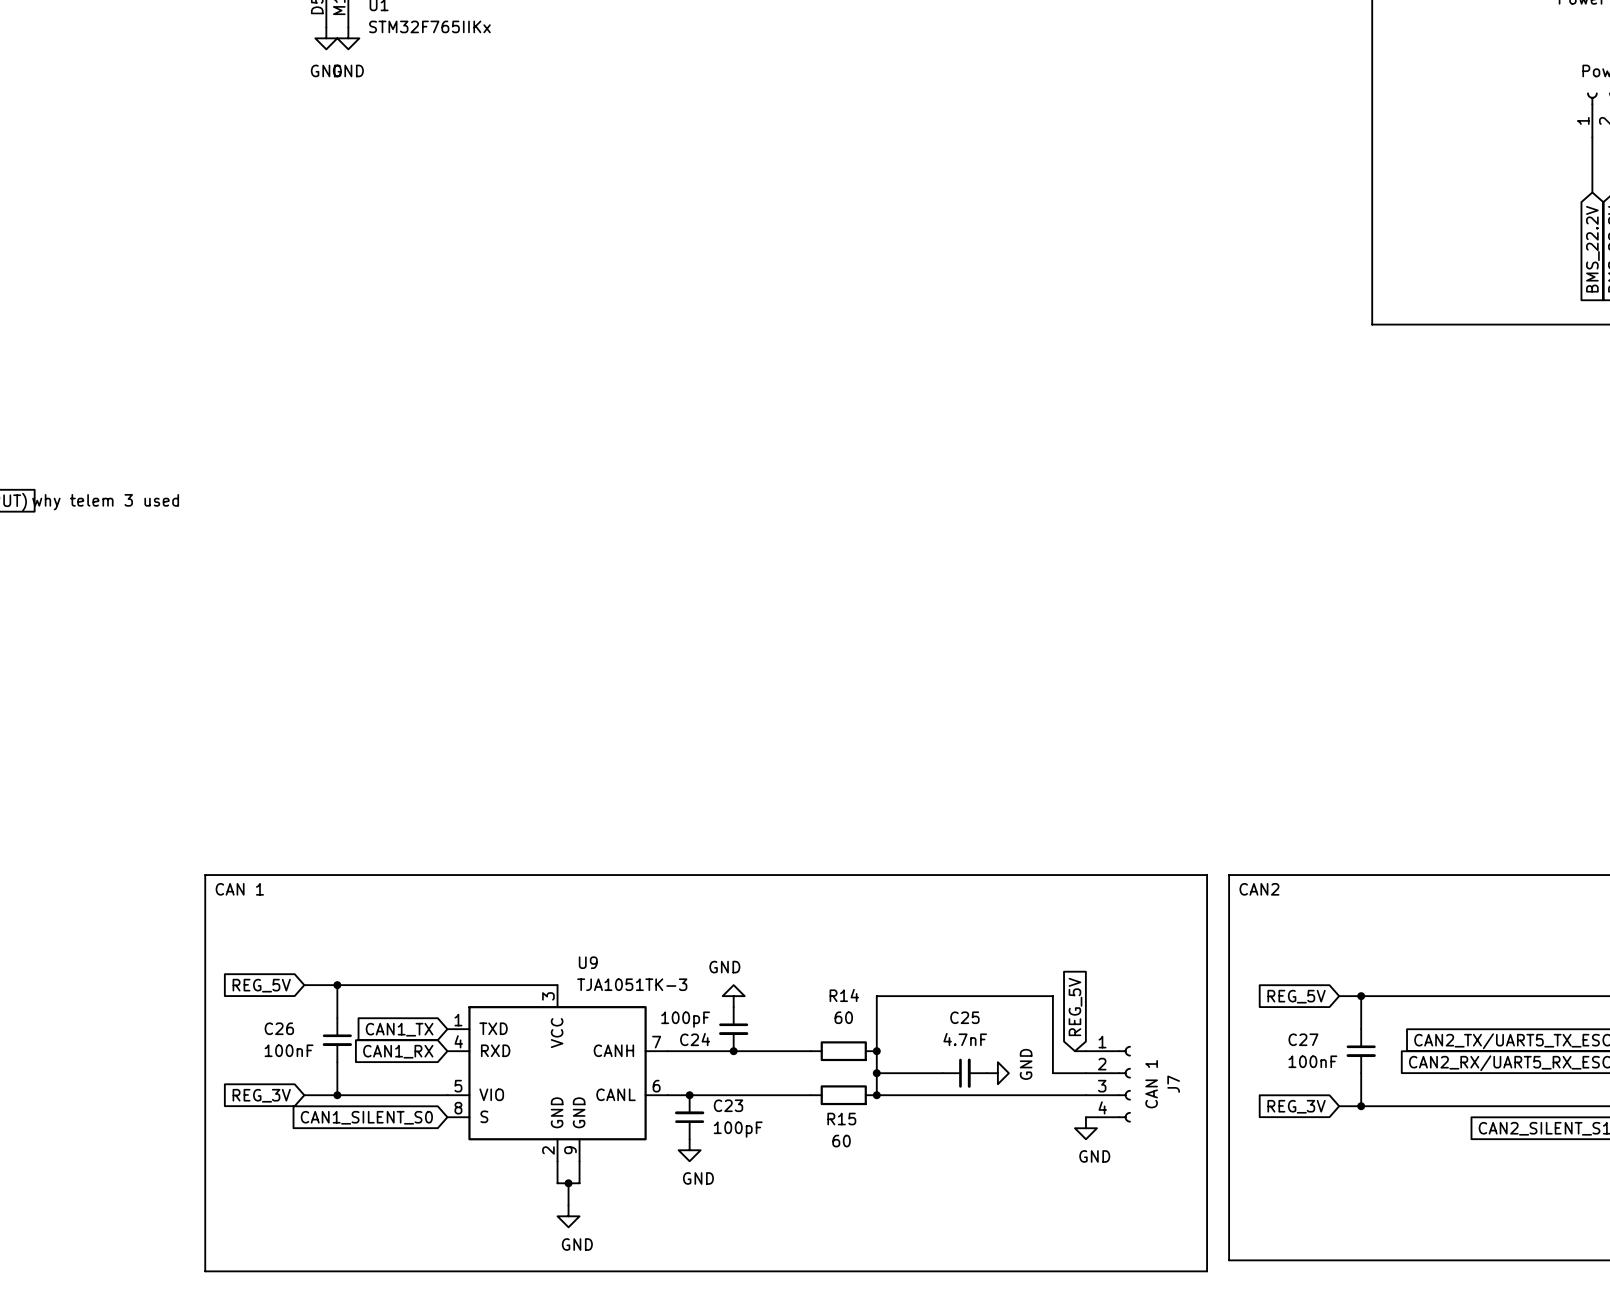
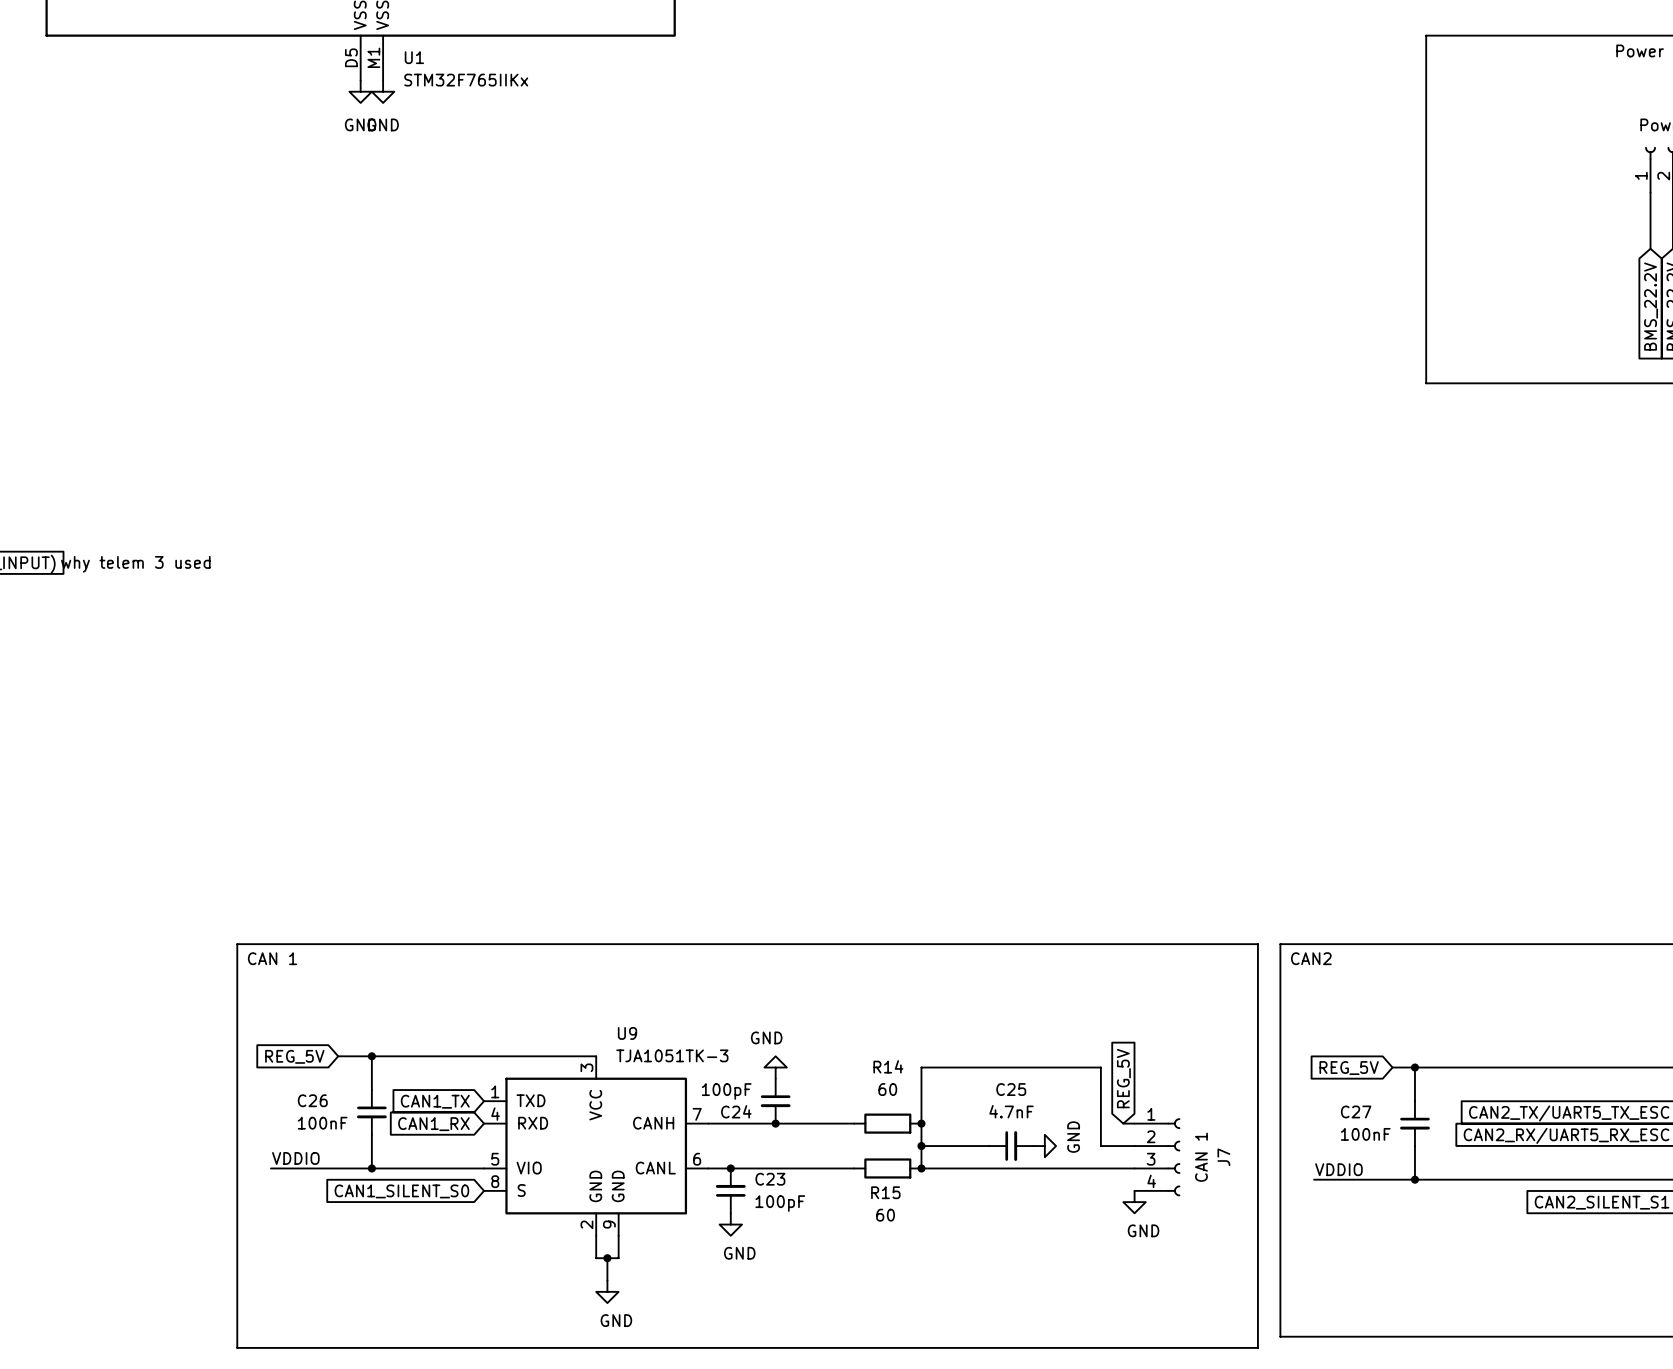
label: none -> VDDIO (295, 1158)
wire: none -> (270, 1168) (338, 1168)
global label: REG_3V (261, 1095) -> none
label: none -> VDDIO (1338, 1169)
wire: none -> (1314, 1179) (1392, 1179)
global label: REG_3V (1296, 1106) -> none

